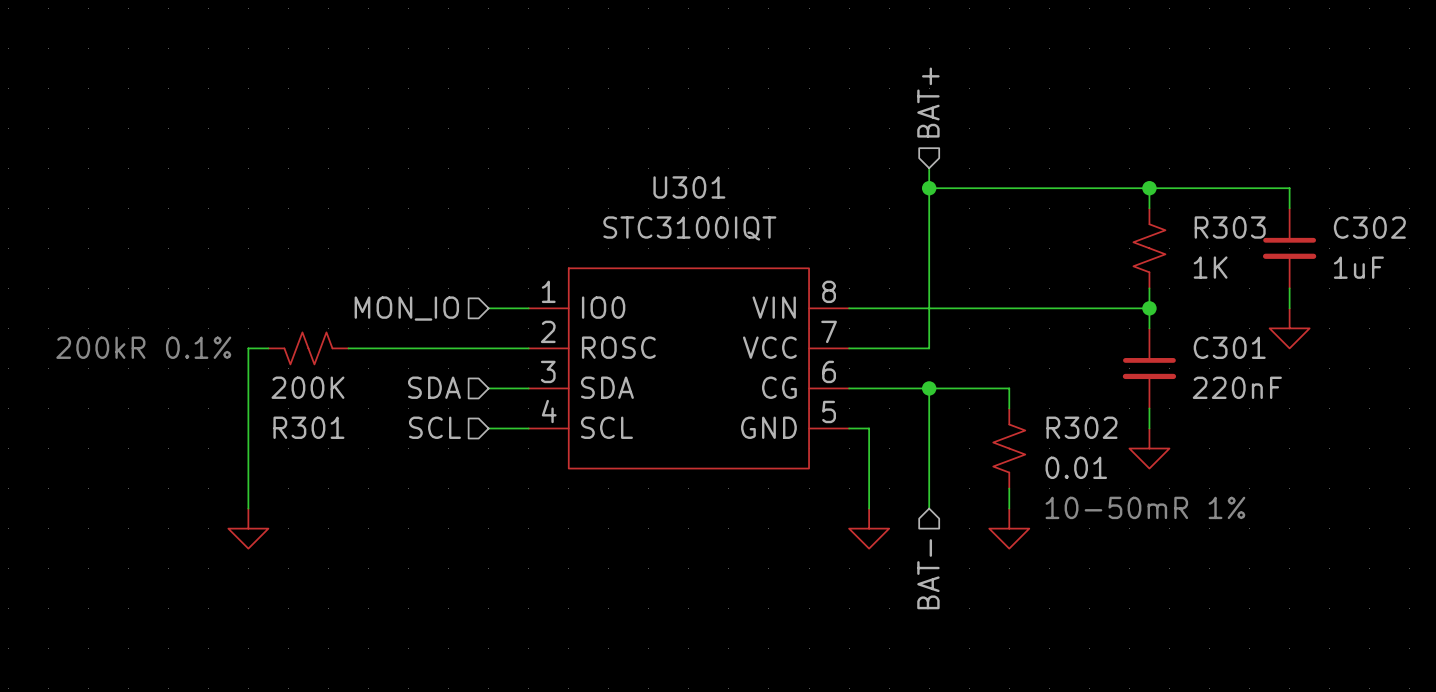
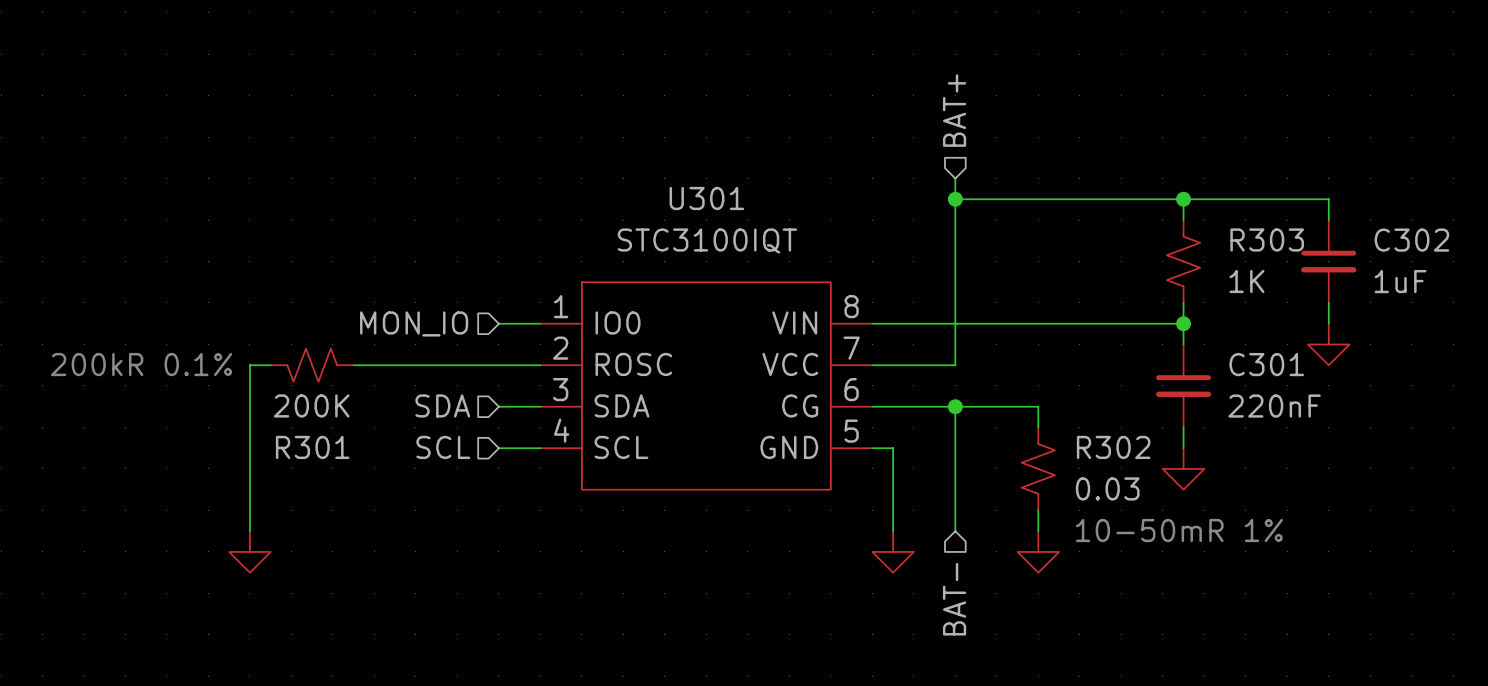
R302 value: 0.01 (1076, 467) -> 0.03 (1107, 488)

